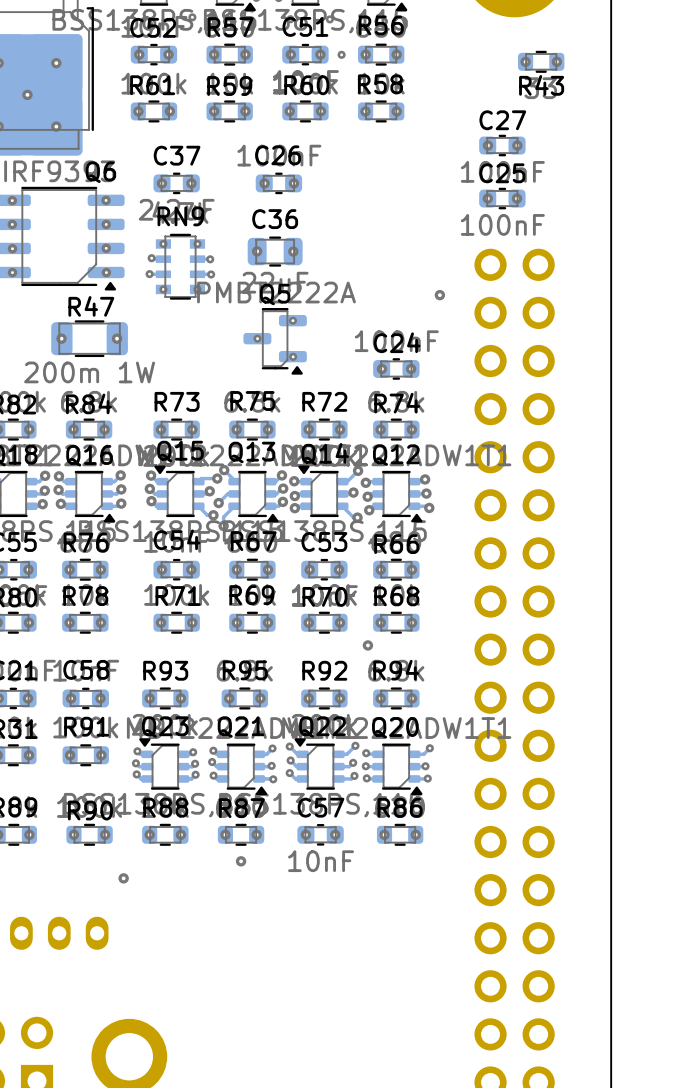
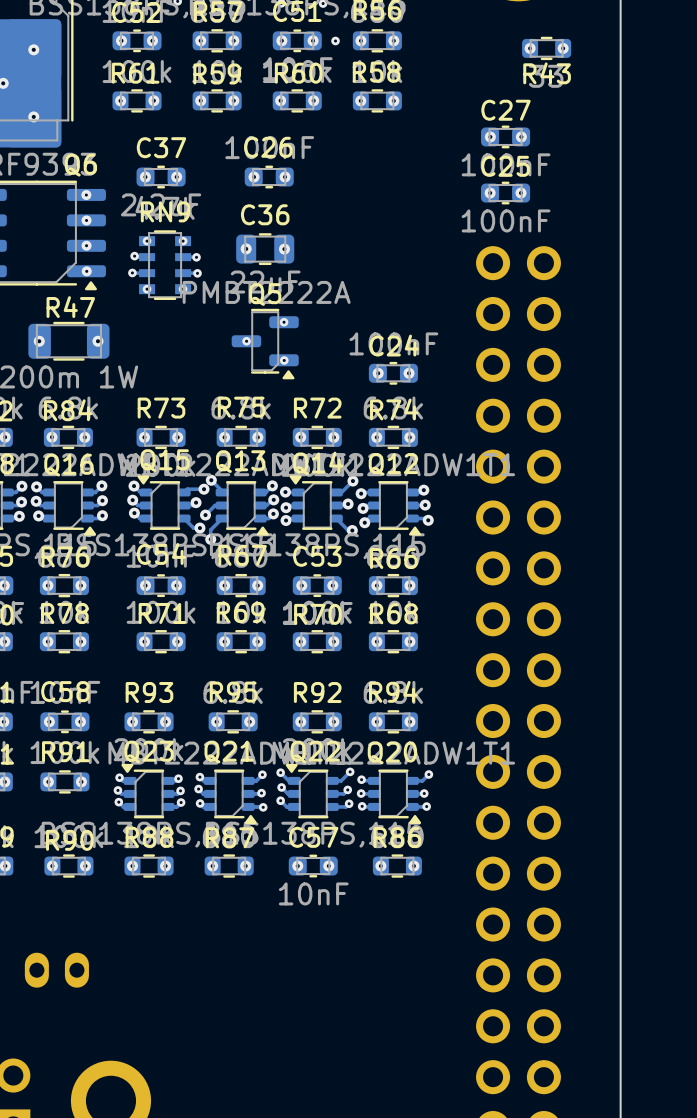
via: (439, 295) -> none
via: (367, 645) -> none
via: (241, 861) -> none
via: (123, 878) -> none

